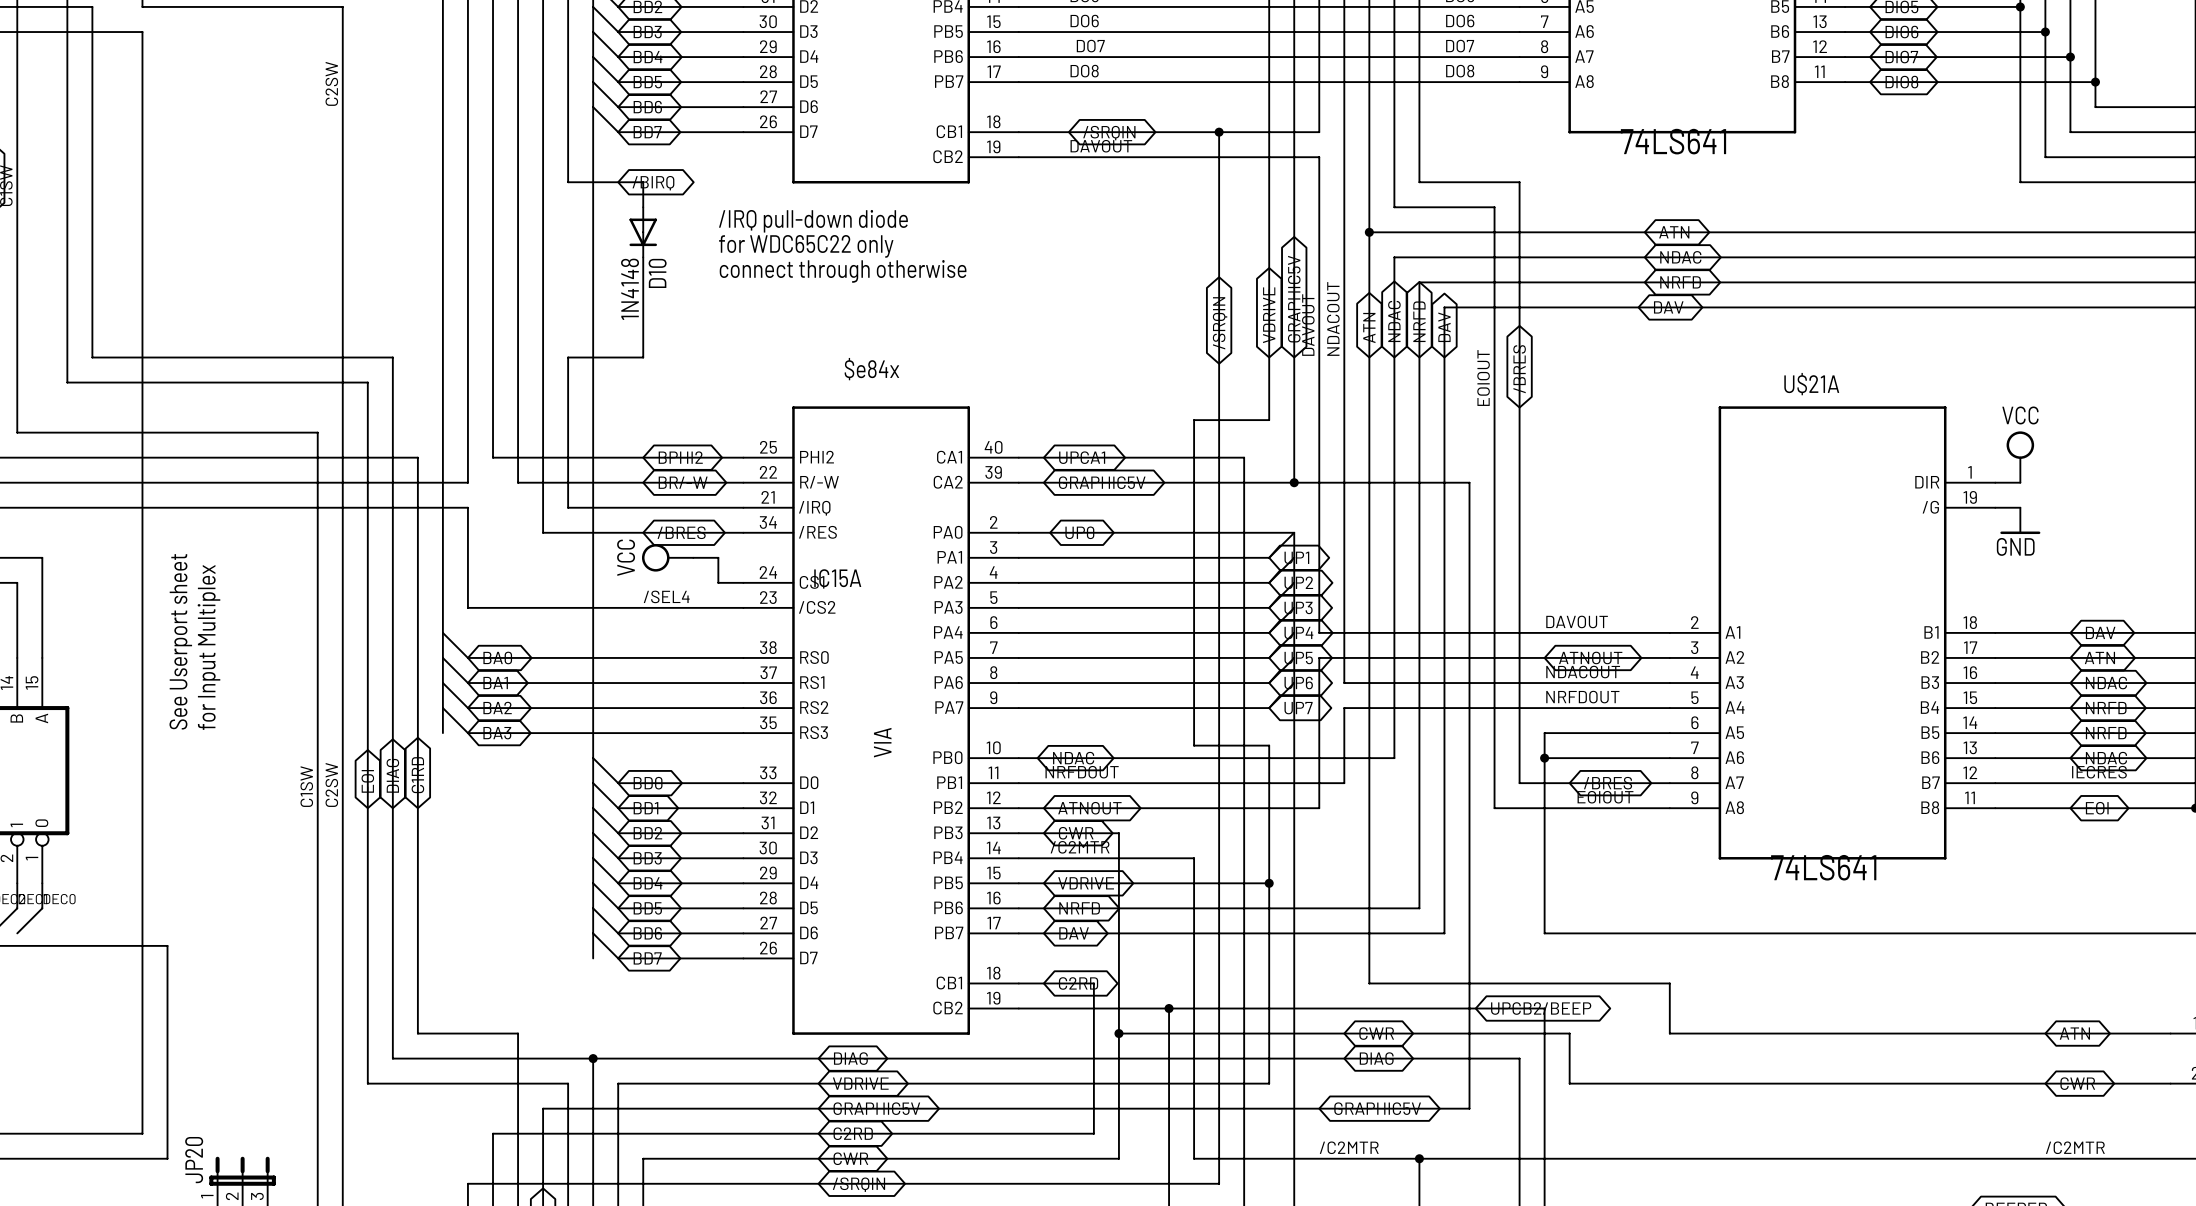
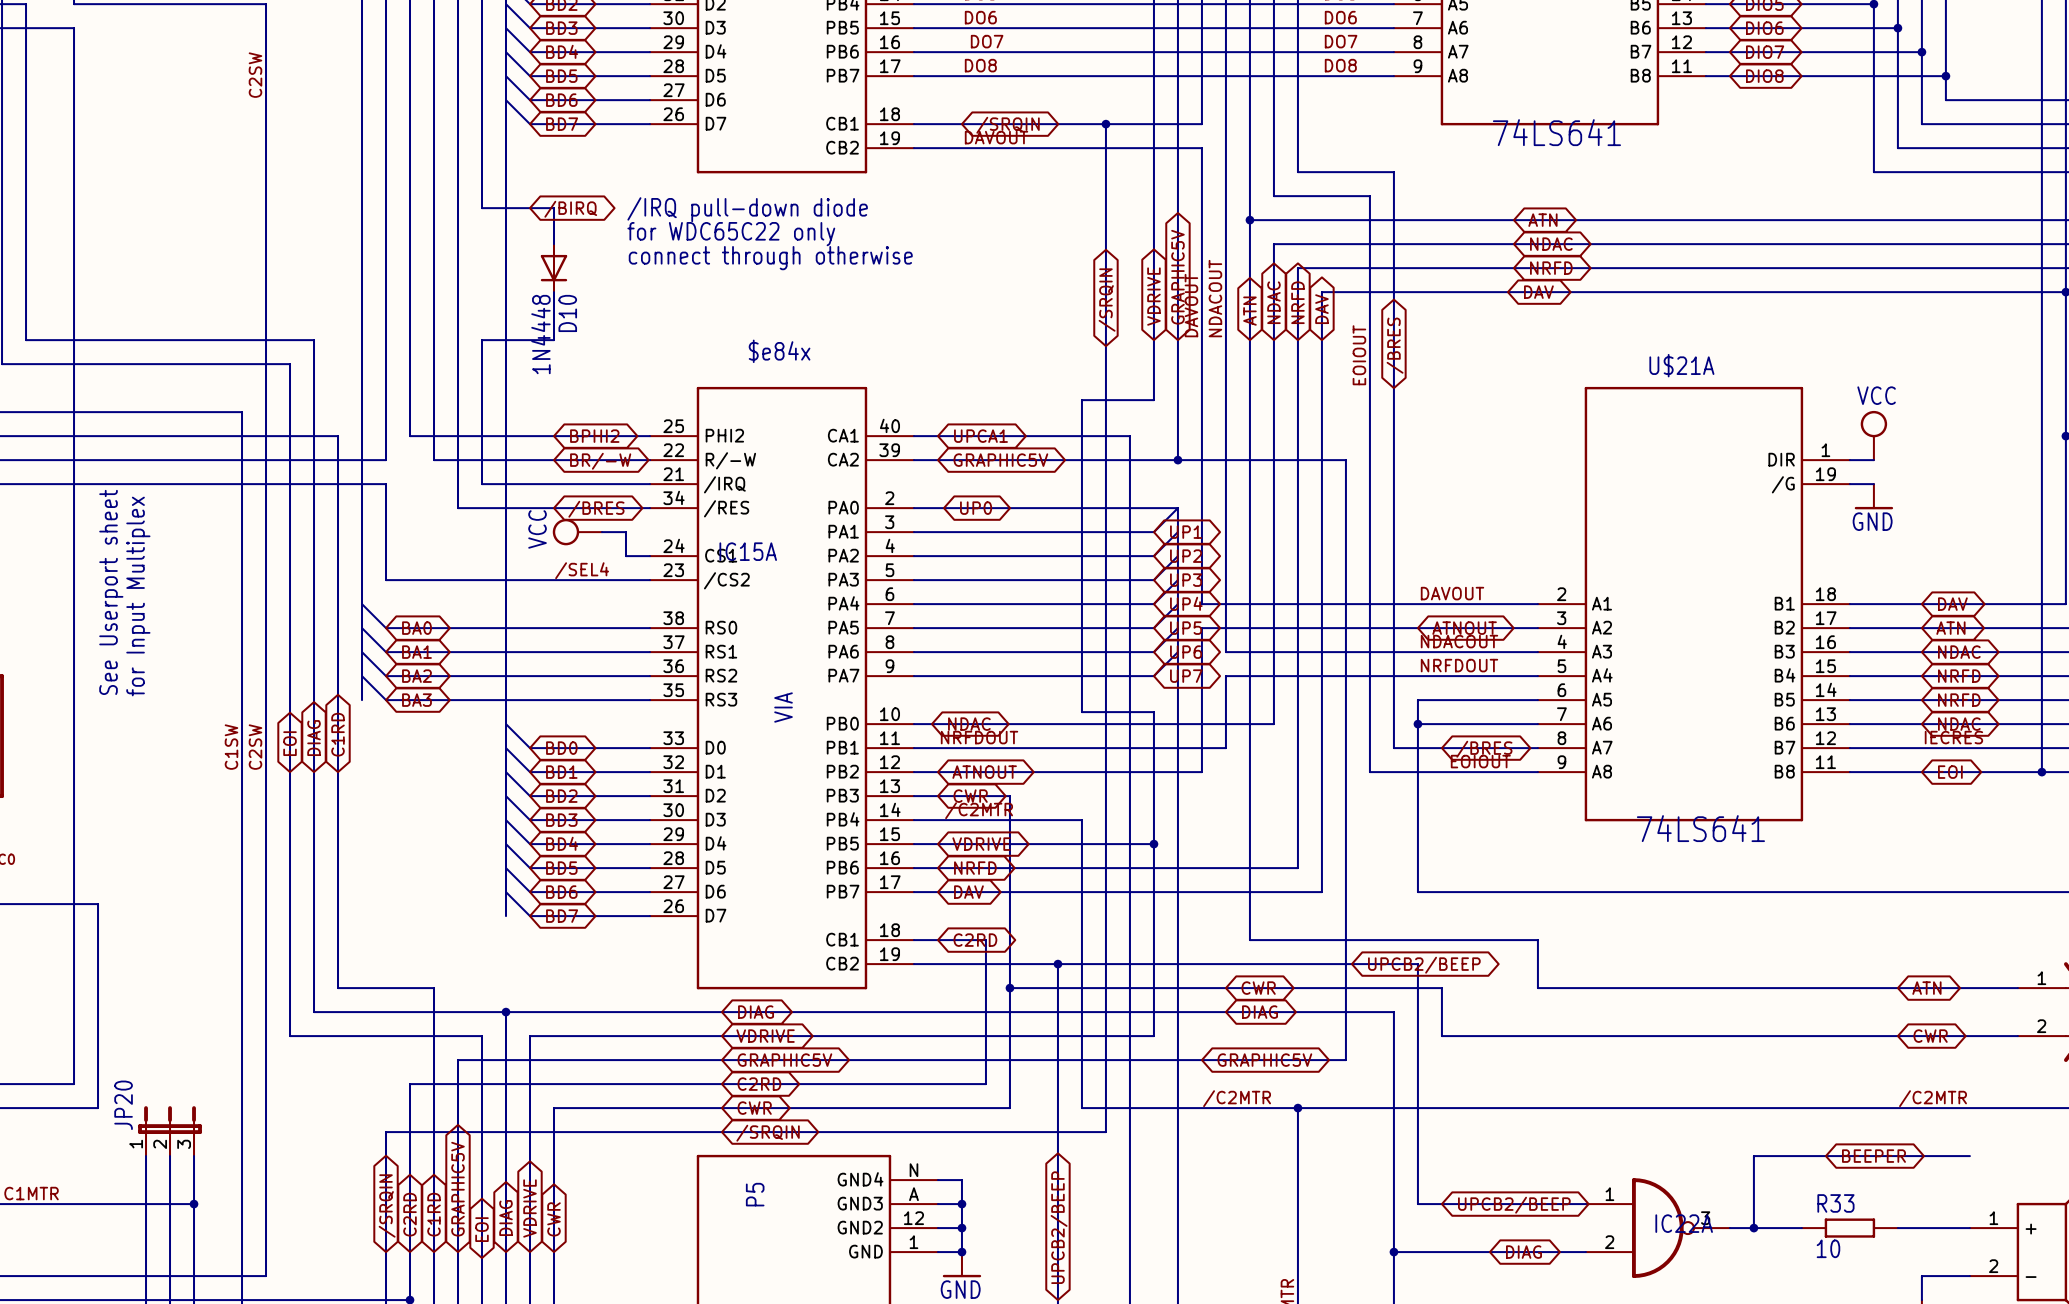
wire: (568, 182) (643, 182) (643, 207) -> (482, 172) (482, 208) (553, 208) (553, 244)
global label position: /BIRQ (653, 183) -> /BIRQ (570, 209)
D10 position: (643, 232) -> (553, 268)
D10 value: 1N4148 (630, 289) -> 1N4448 (540, 334)

